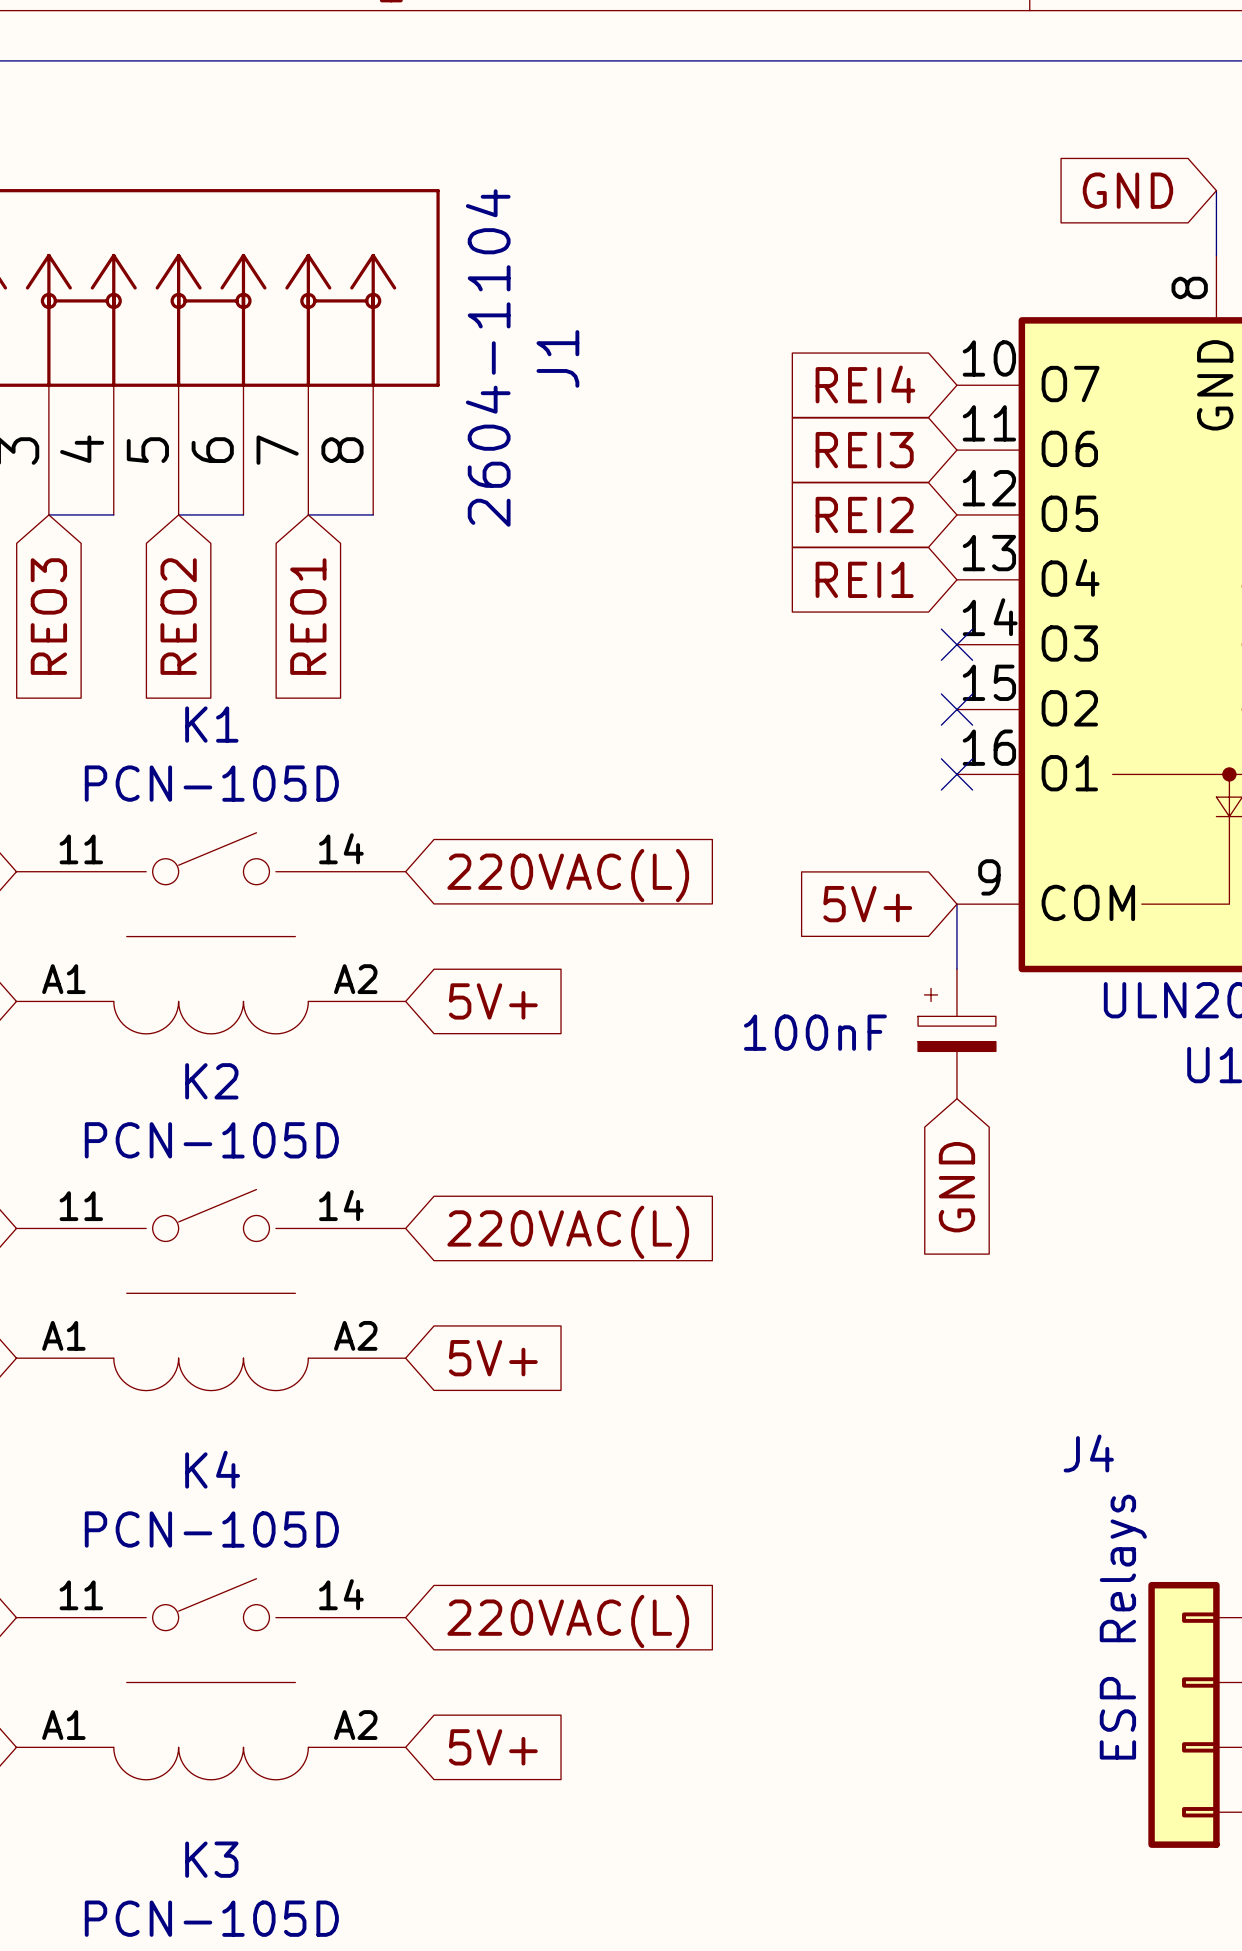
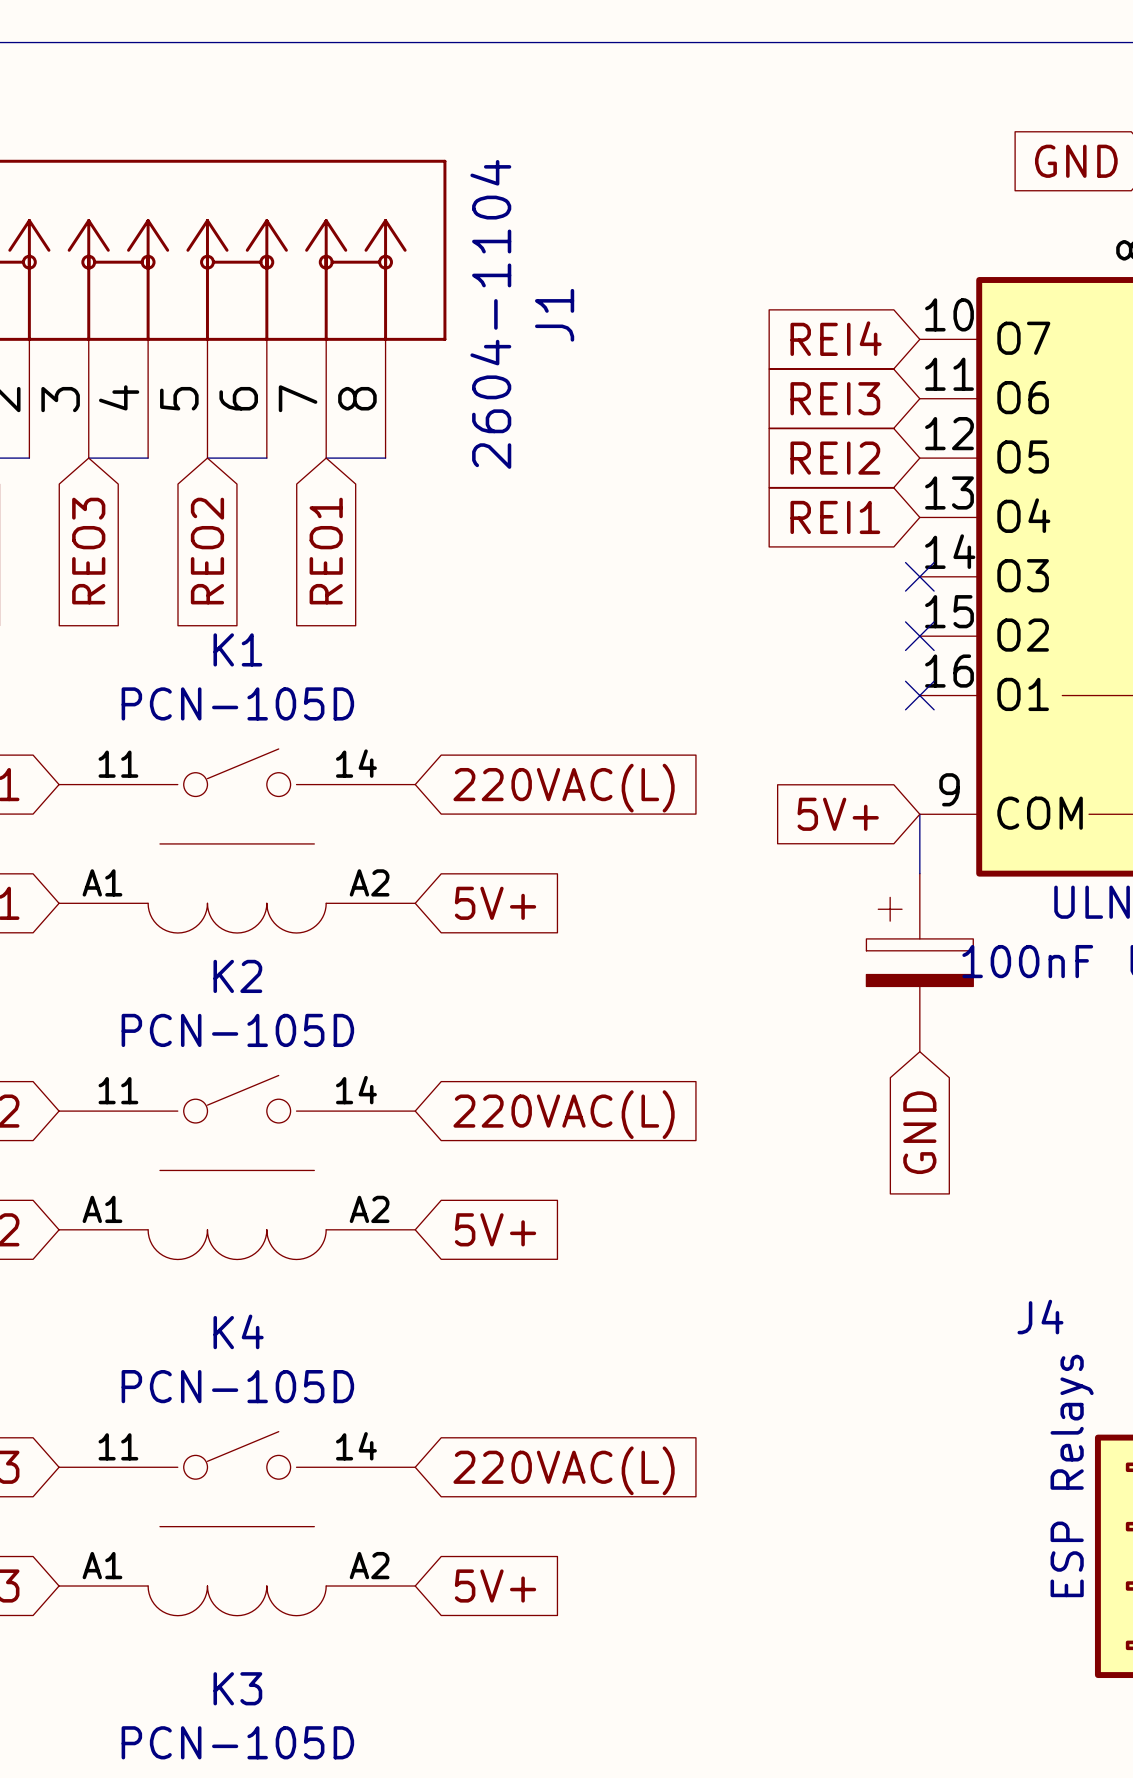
part: 100nF (956, 1033) -> none
part: none -> 100nF (919, 962)
global label position: GND (956, 1187) -> GND (919, 1132)

